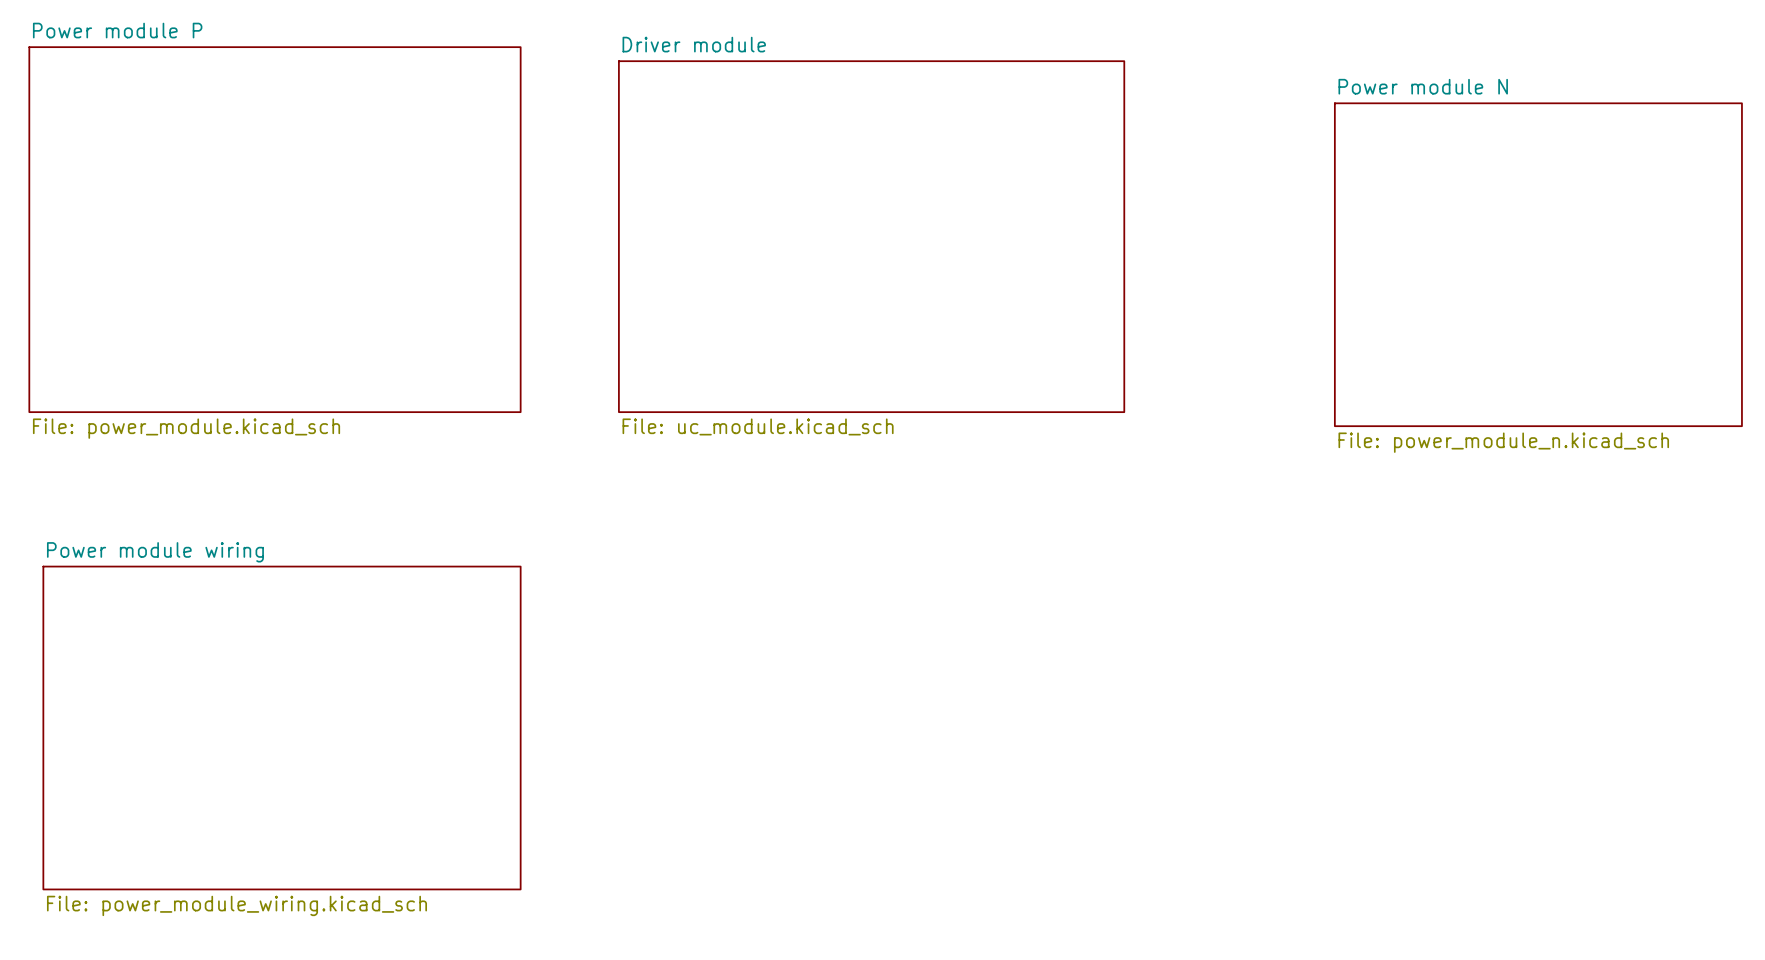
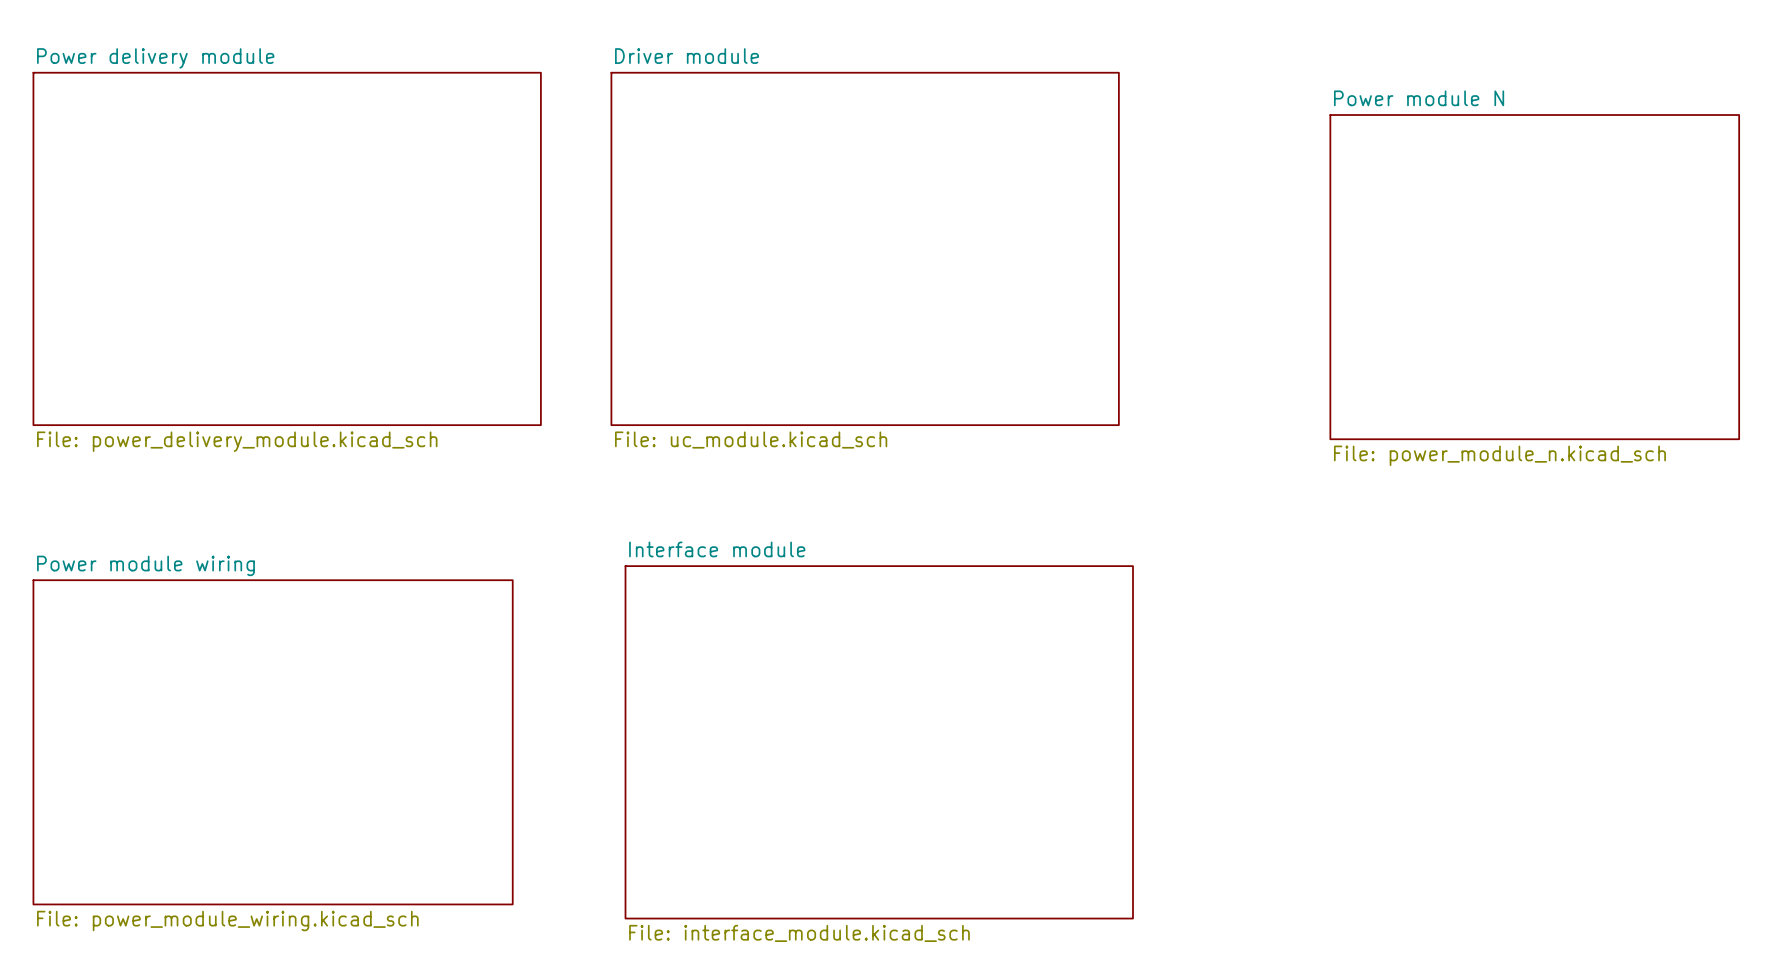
sheet Power module P: File: power_module.kicad_sch (274, 229) -> none
sheet Power delivery module: none -> File: power_delivery_module.kicad_sch (287, 248)
sheet Interface module: none -> File: interface_module.kicad_sch (879, 742)

